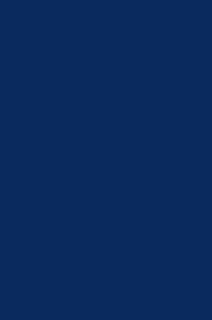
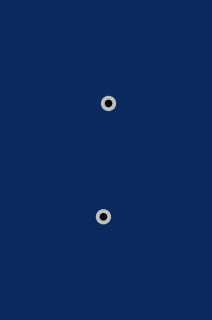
via: none -> (108, 103)
via: none -> (103, 216)

